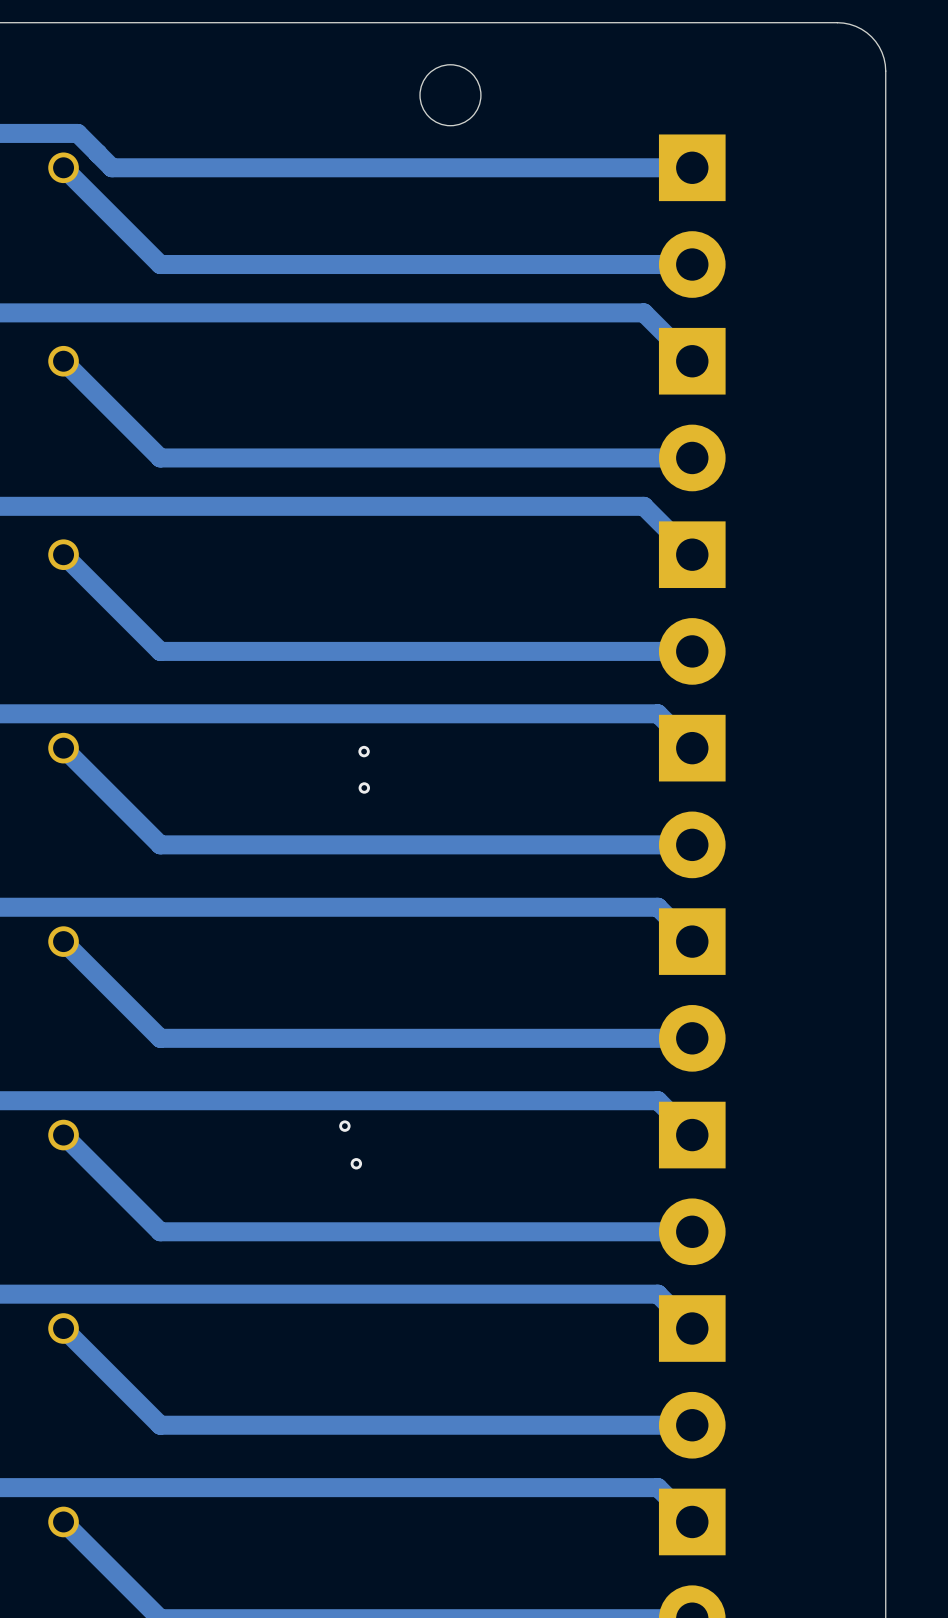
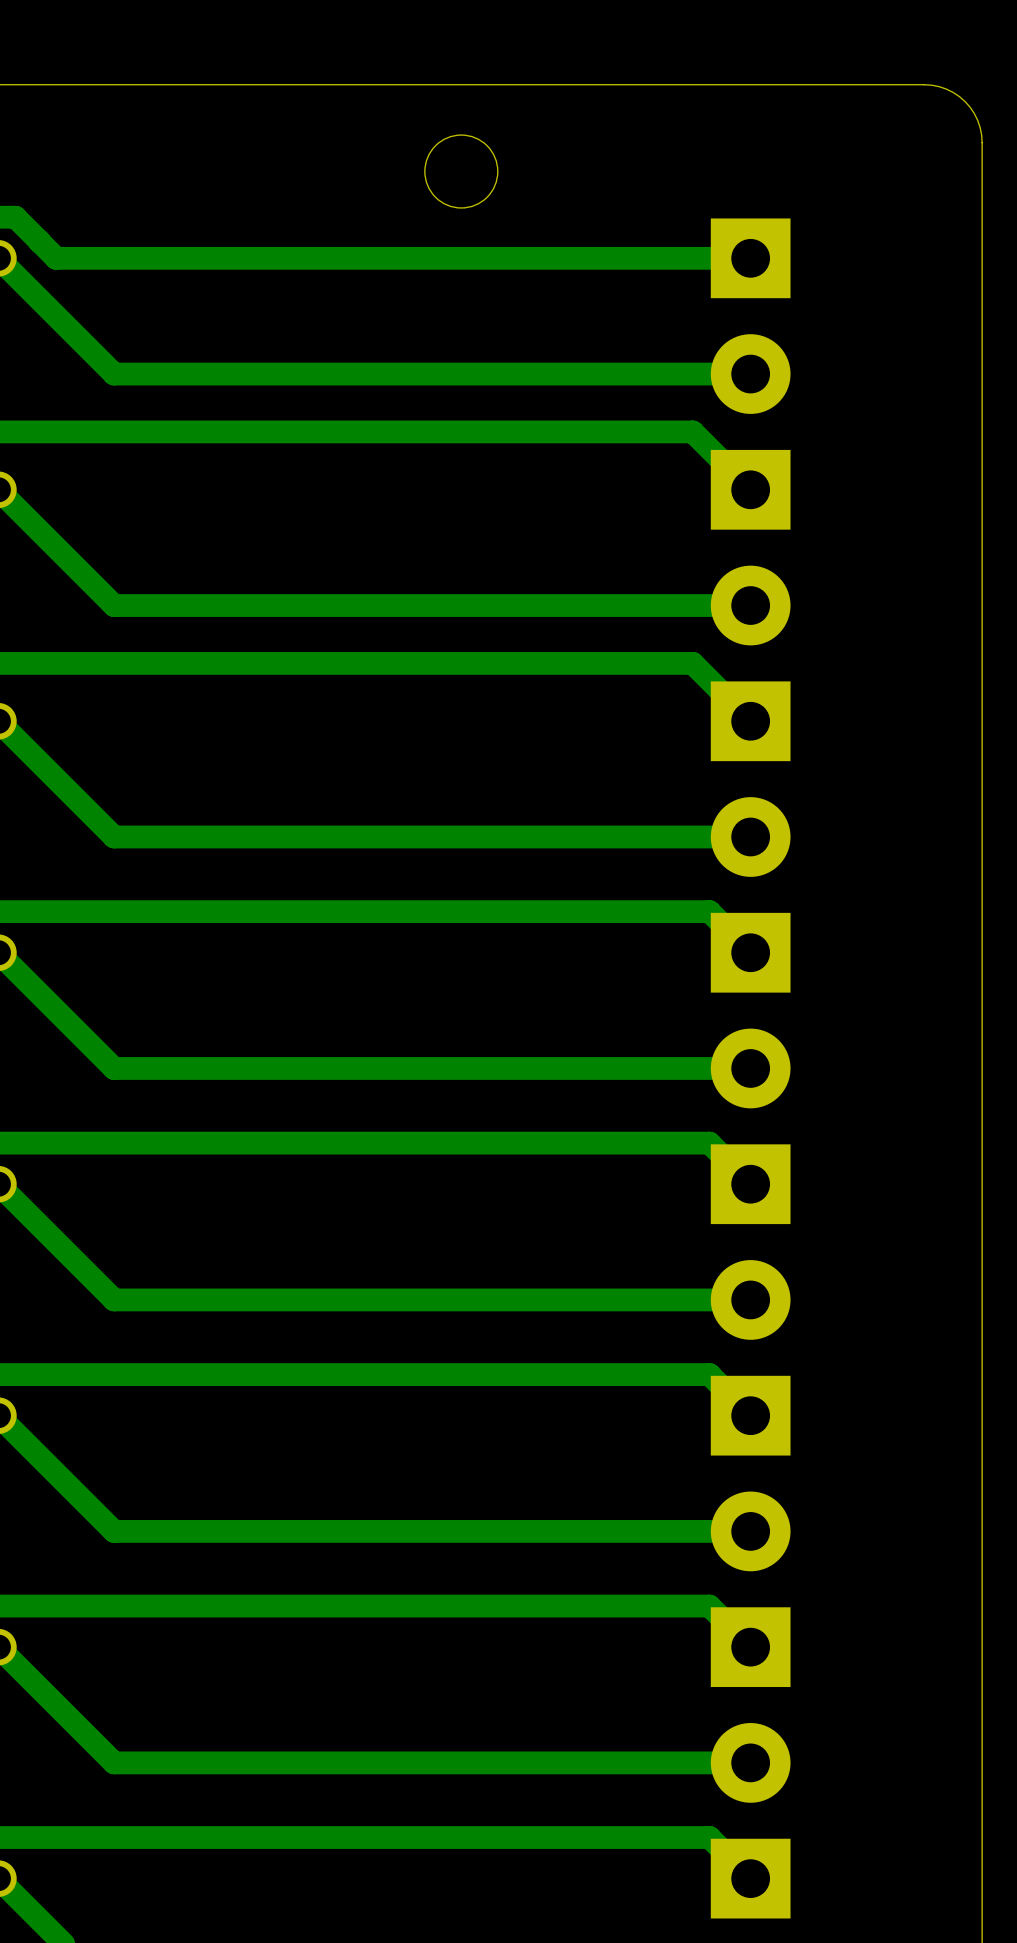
via: (364, 751) -> none
via: (364, 787) -> none
via: (344, 1126) -> none
via: (356, 1163) -> none

